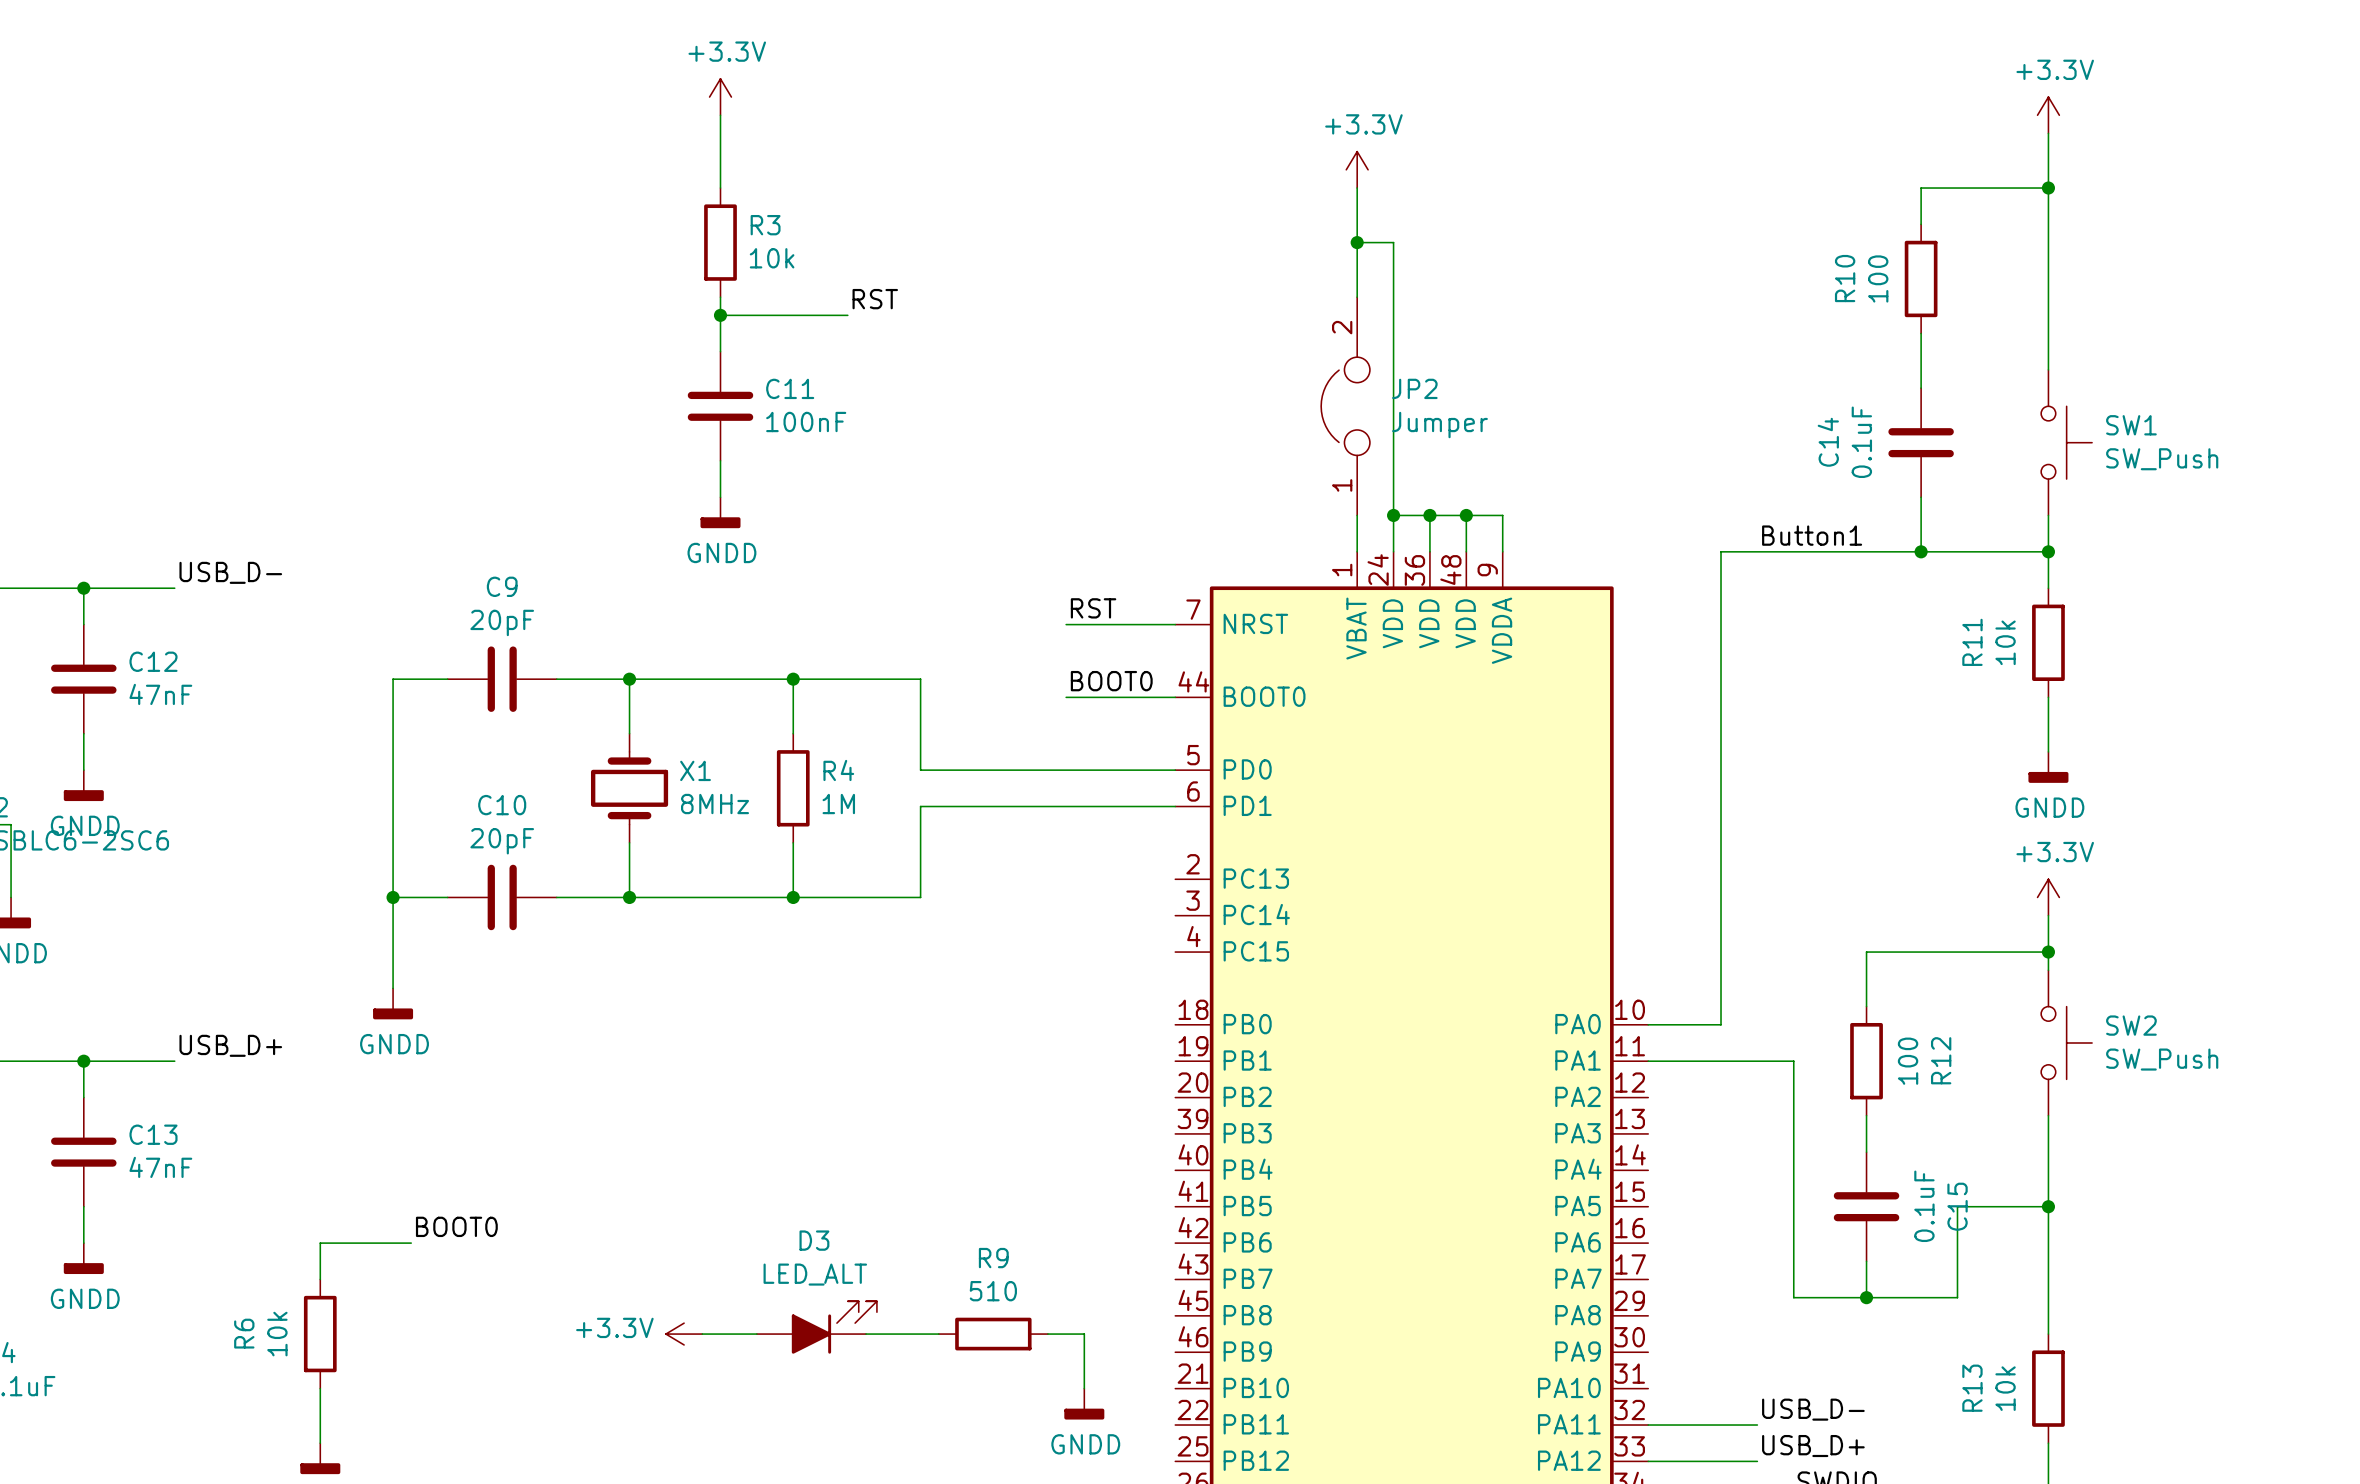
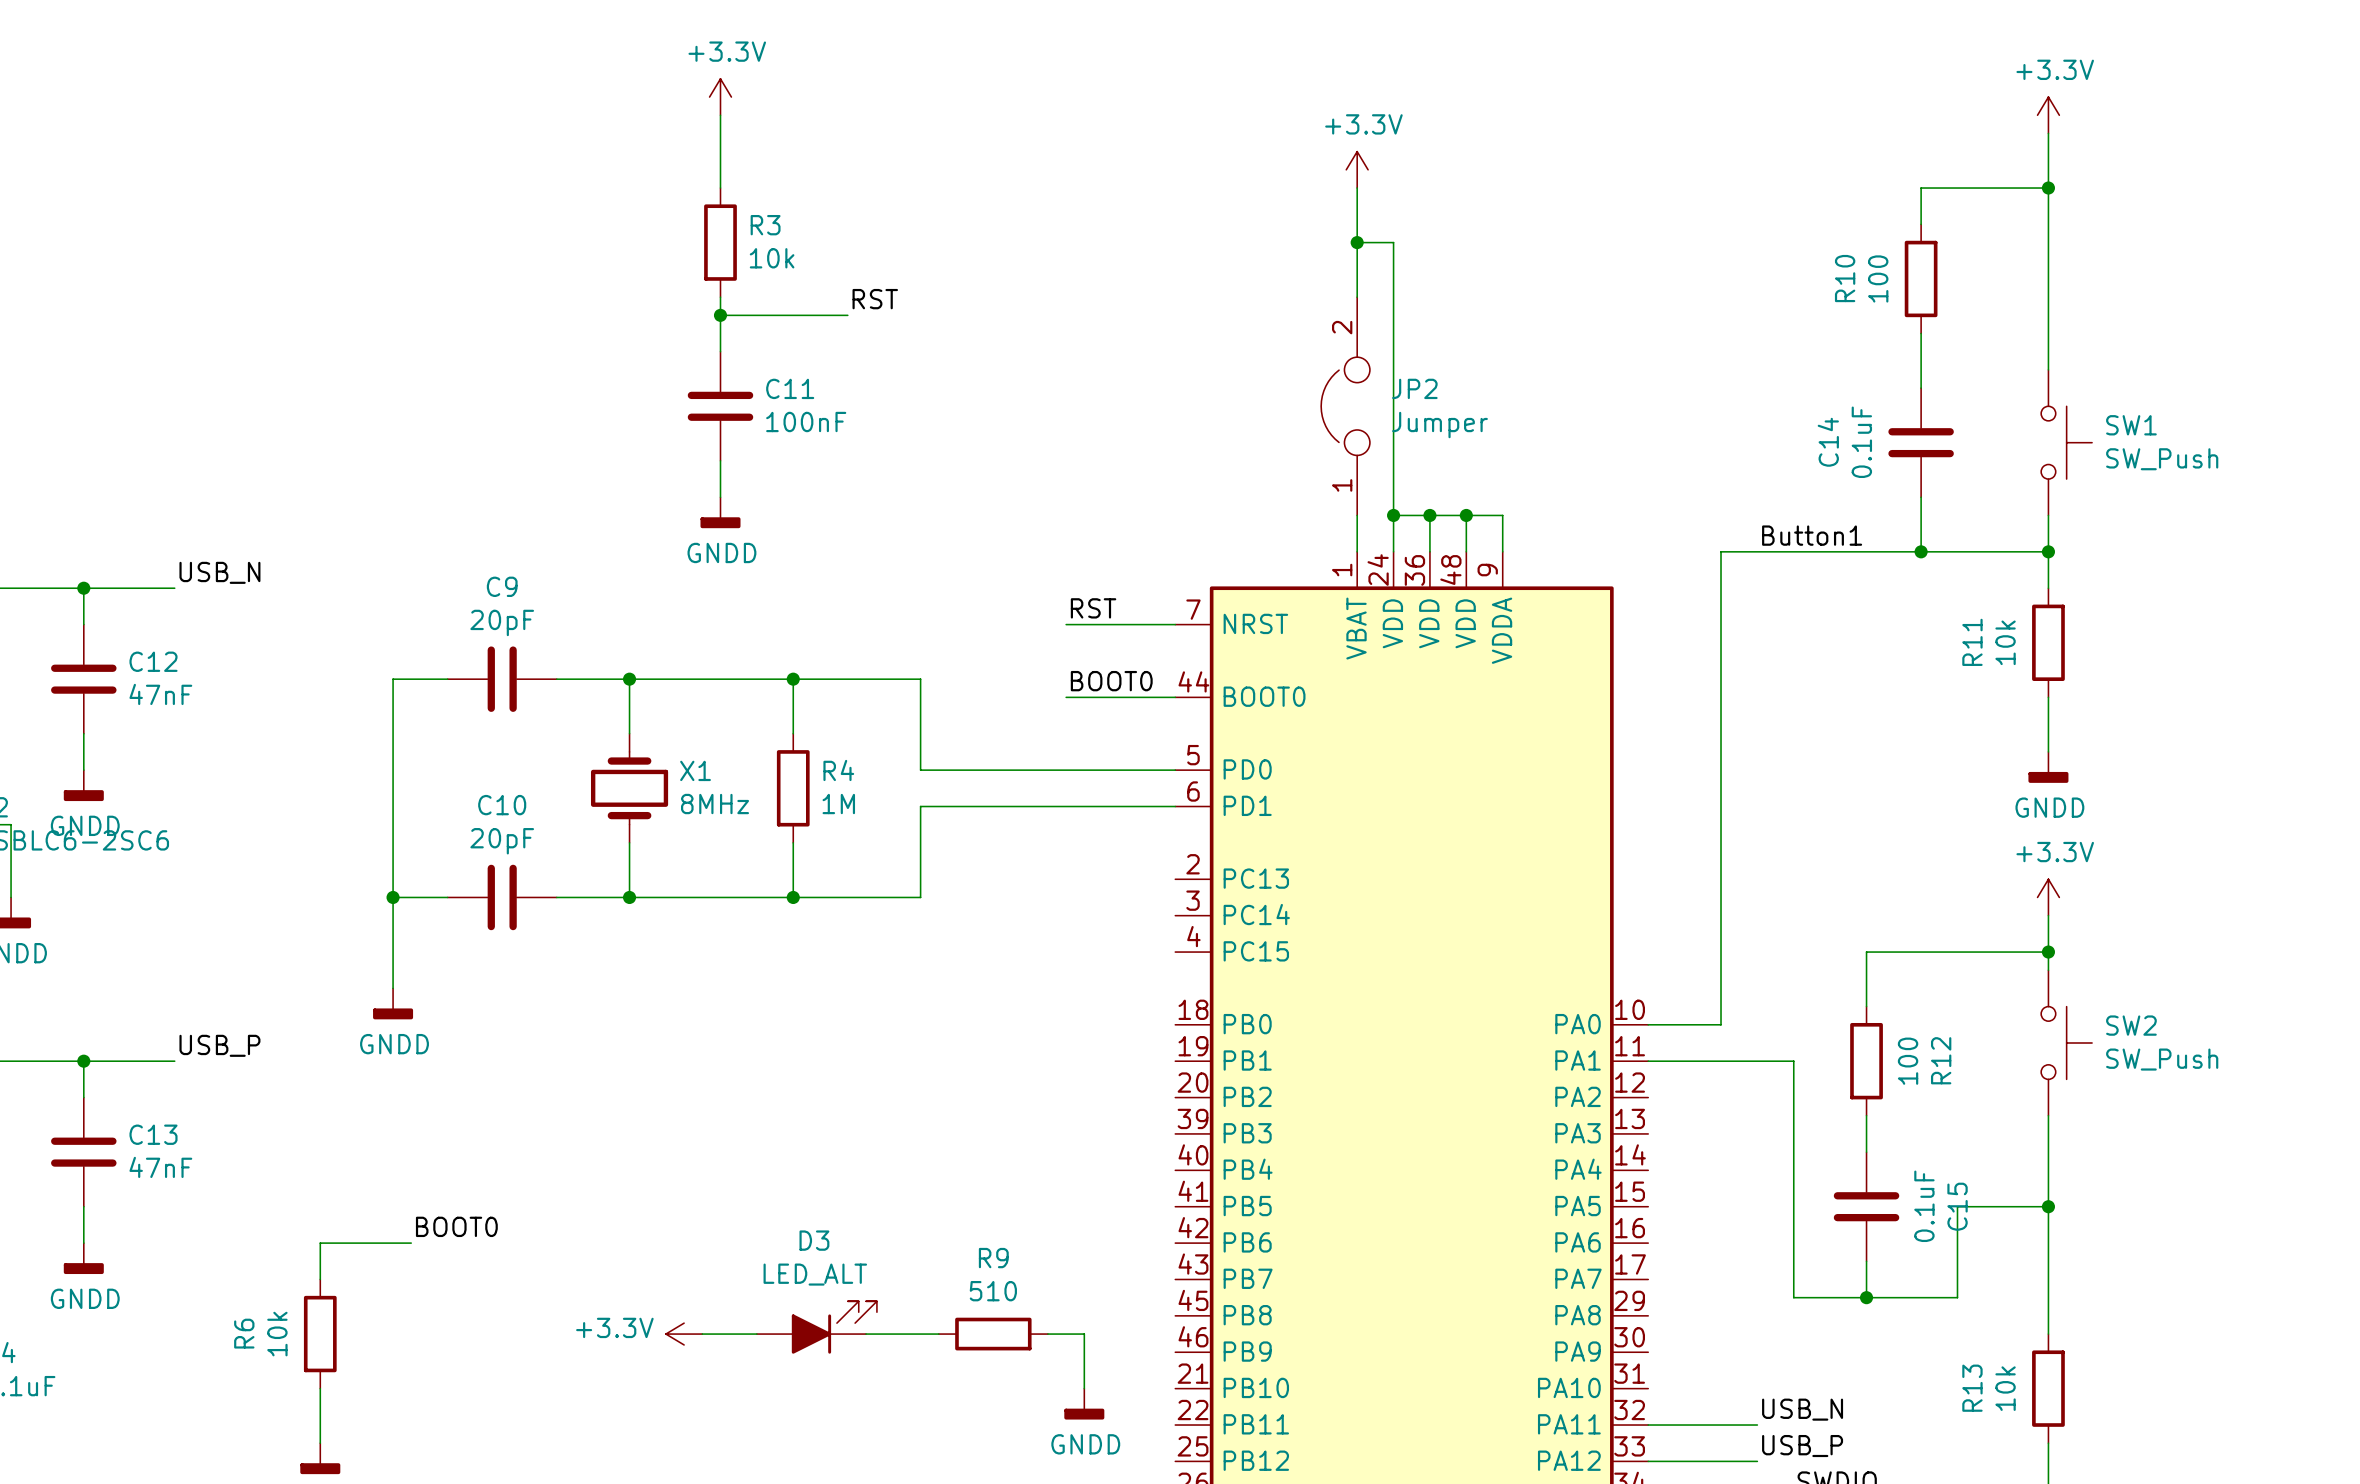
label: USB_D- (230, 572) -> USB_N (219, 572)
label: USB_D+ (230, 1045) -> USB_P (219, 1045)
label: USB_D- (1813, 1409) -> USB_N (1802, 1409)
label: USB_D+ (1813, 1446) -> USB_P (1802, 1446)

